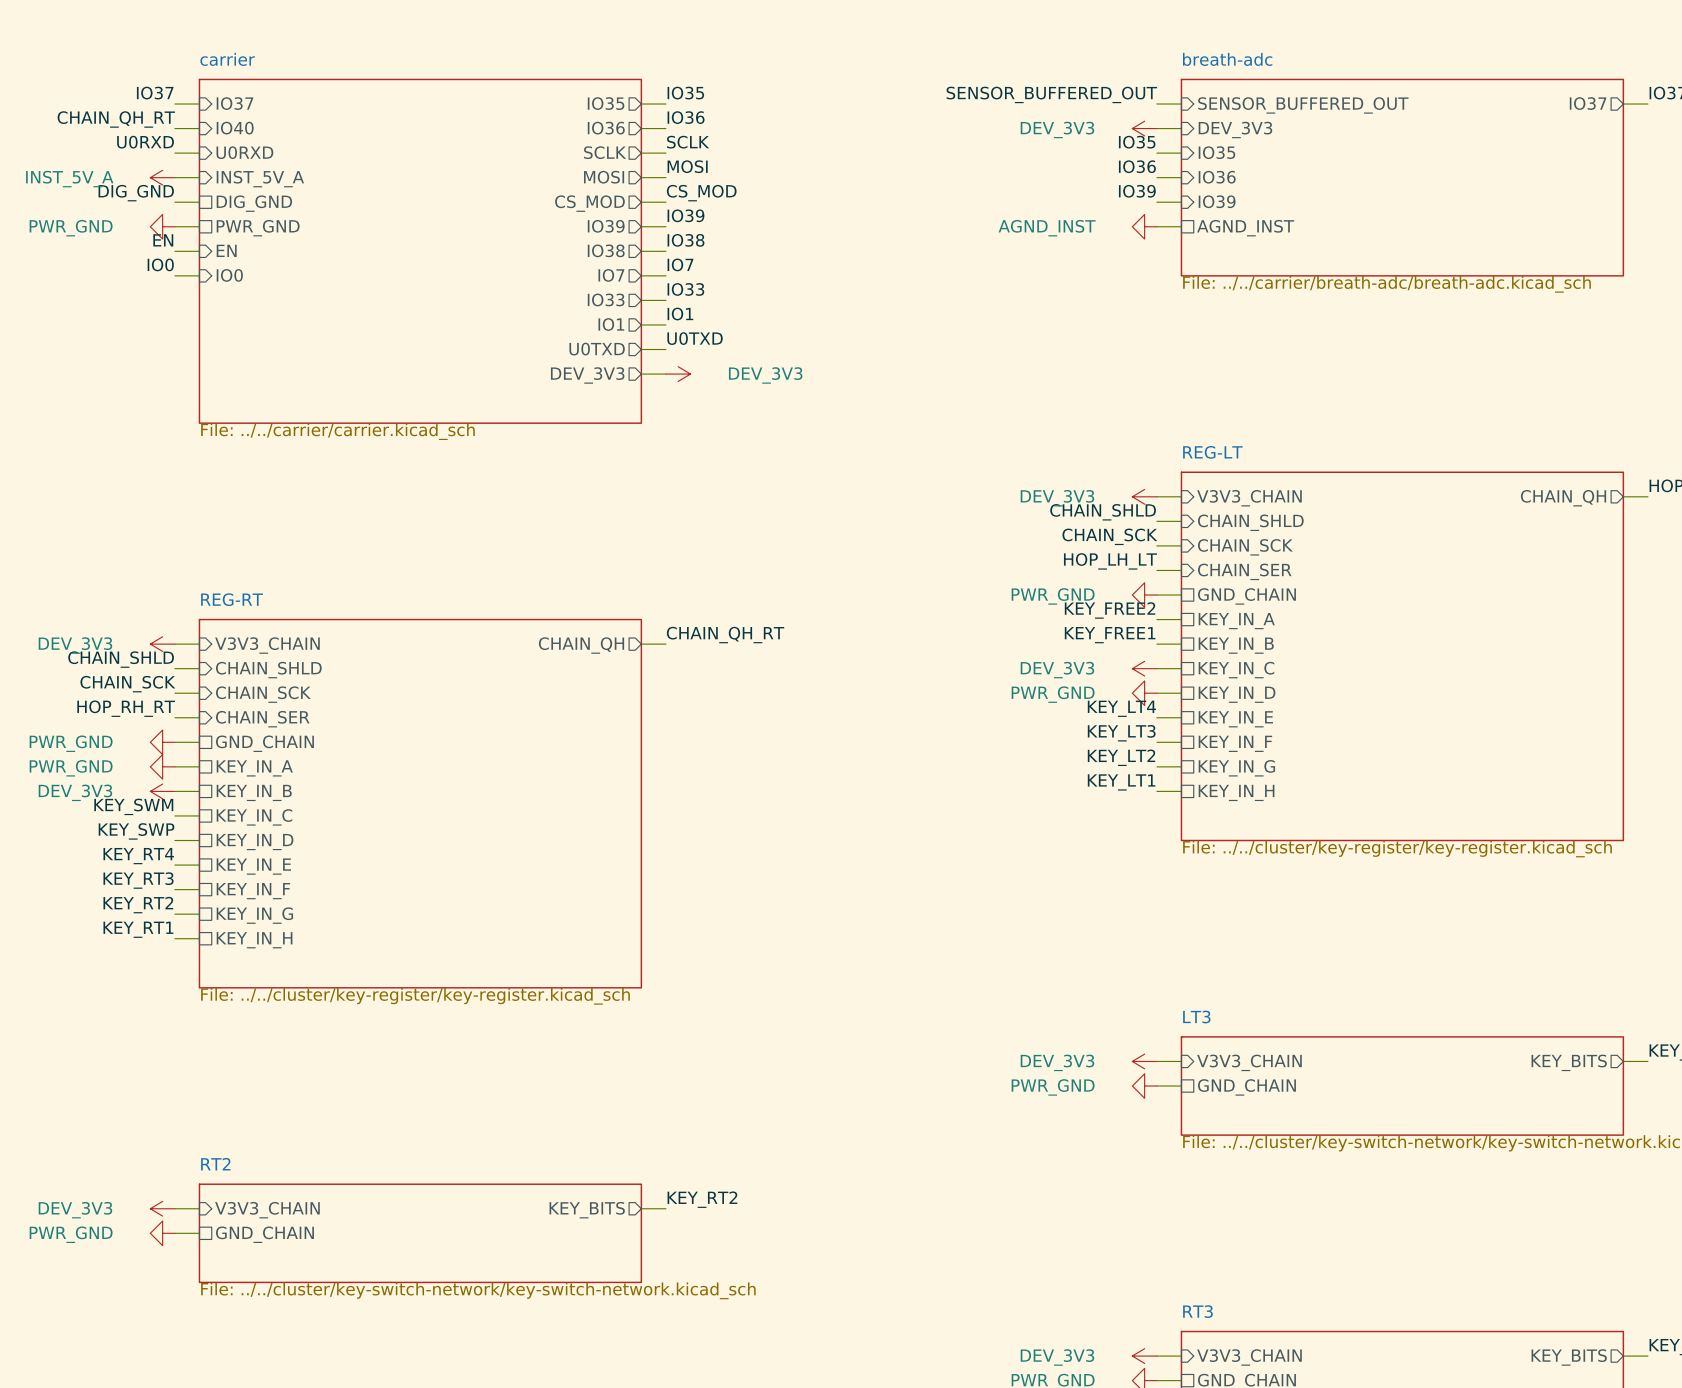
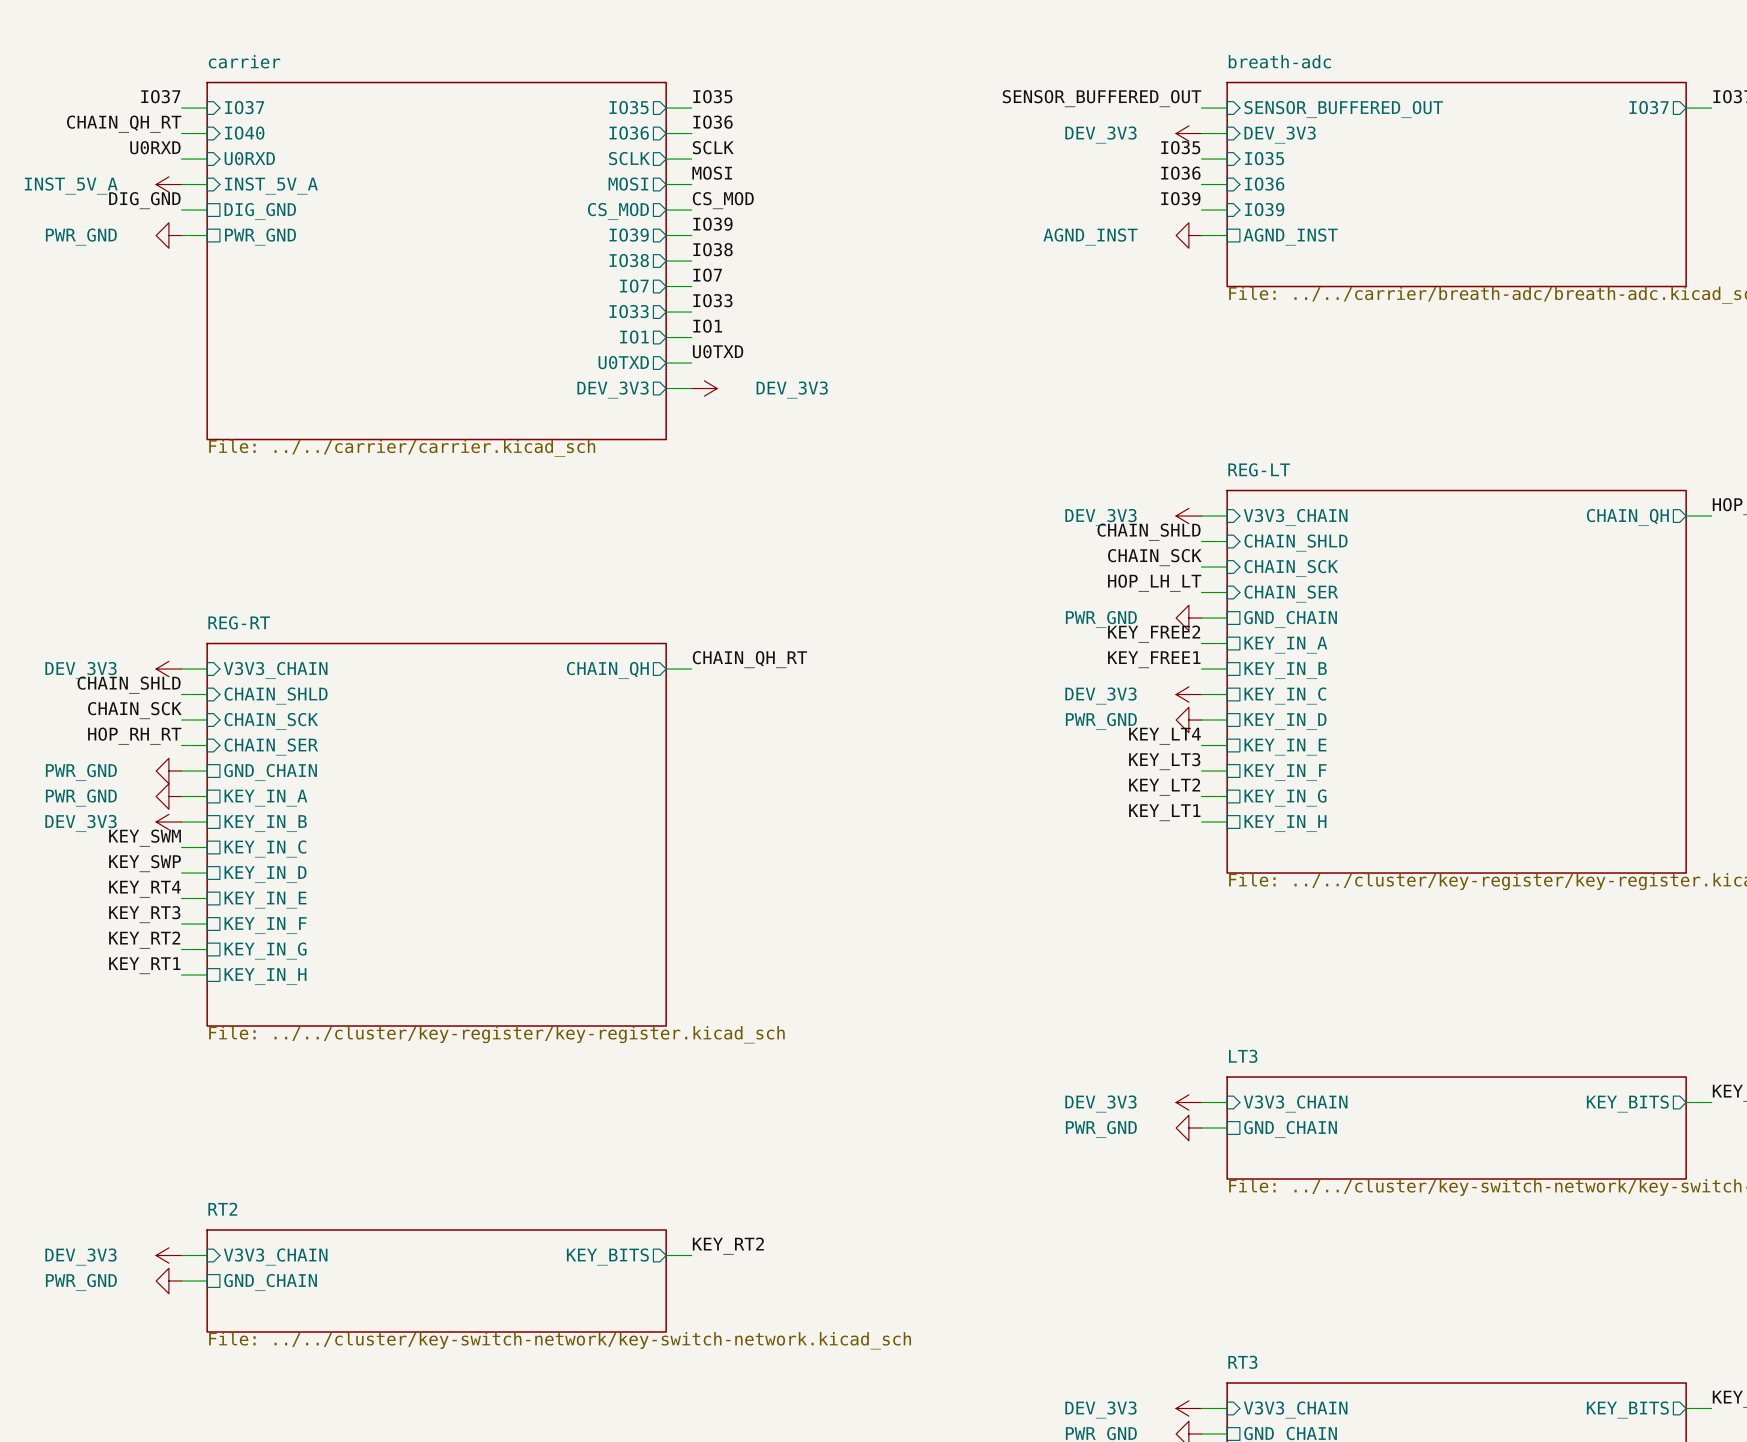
label: EN (163, 240) -> none
sheet pin: EN (226, 250) -> none
wire: (174, 251) (199, 251) -> none
label: IO0 (160, 264) -> none
wire: (174, 275) (199, 275) -> none
sheet pin: IO0 (229, 275) -> none

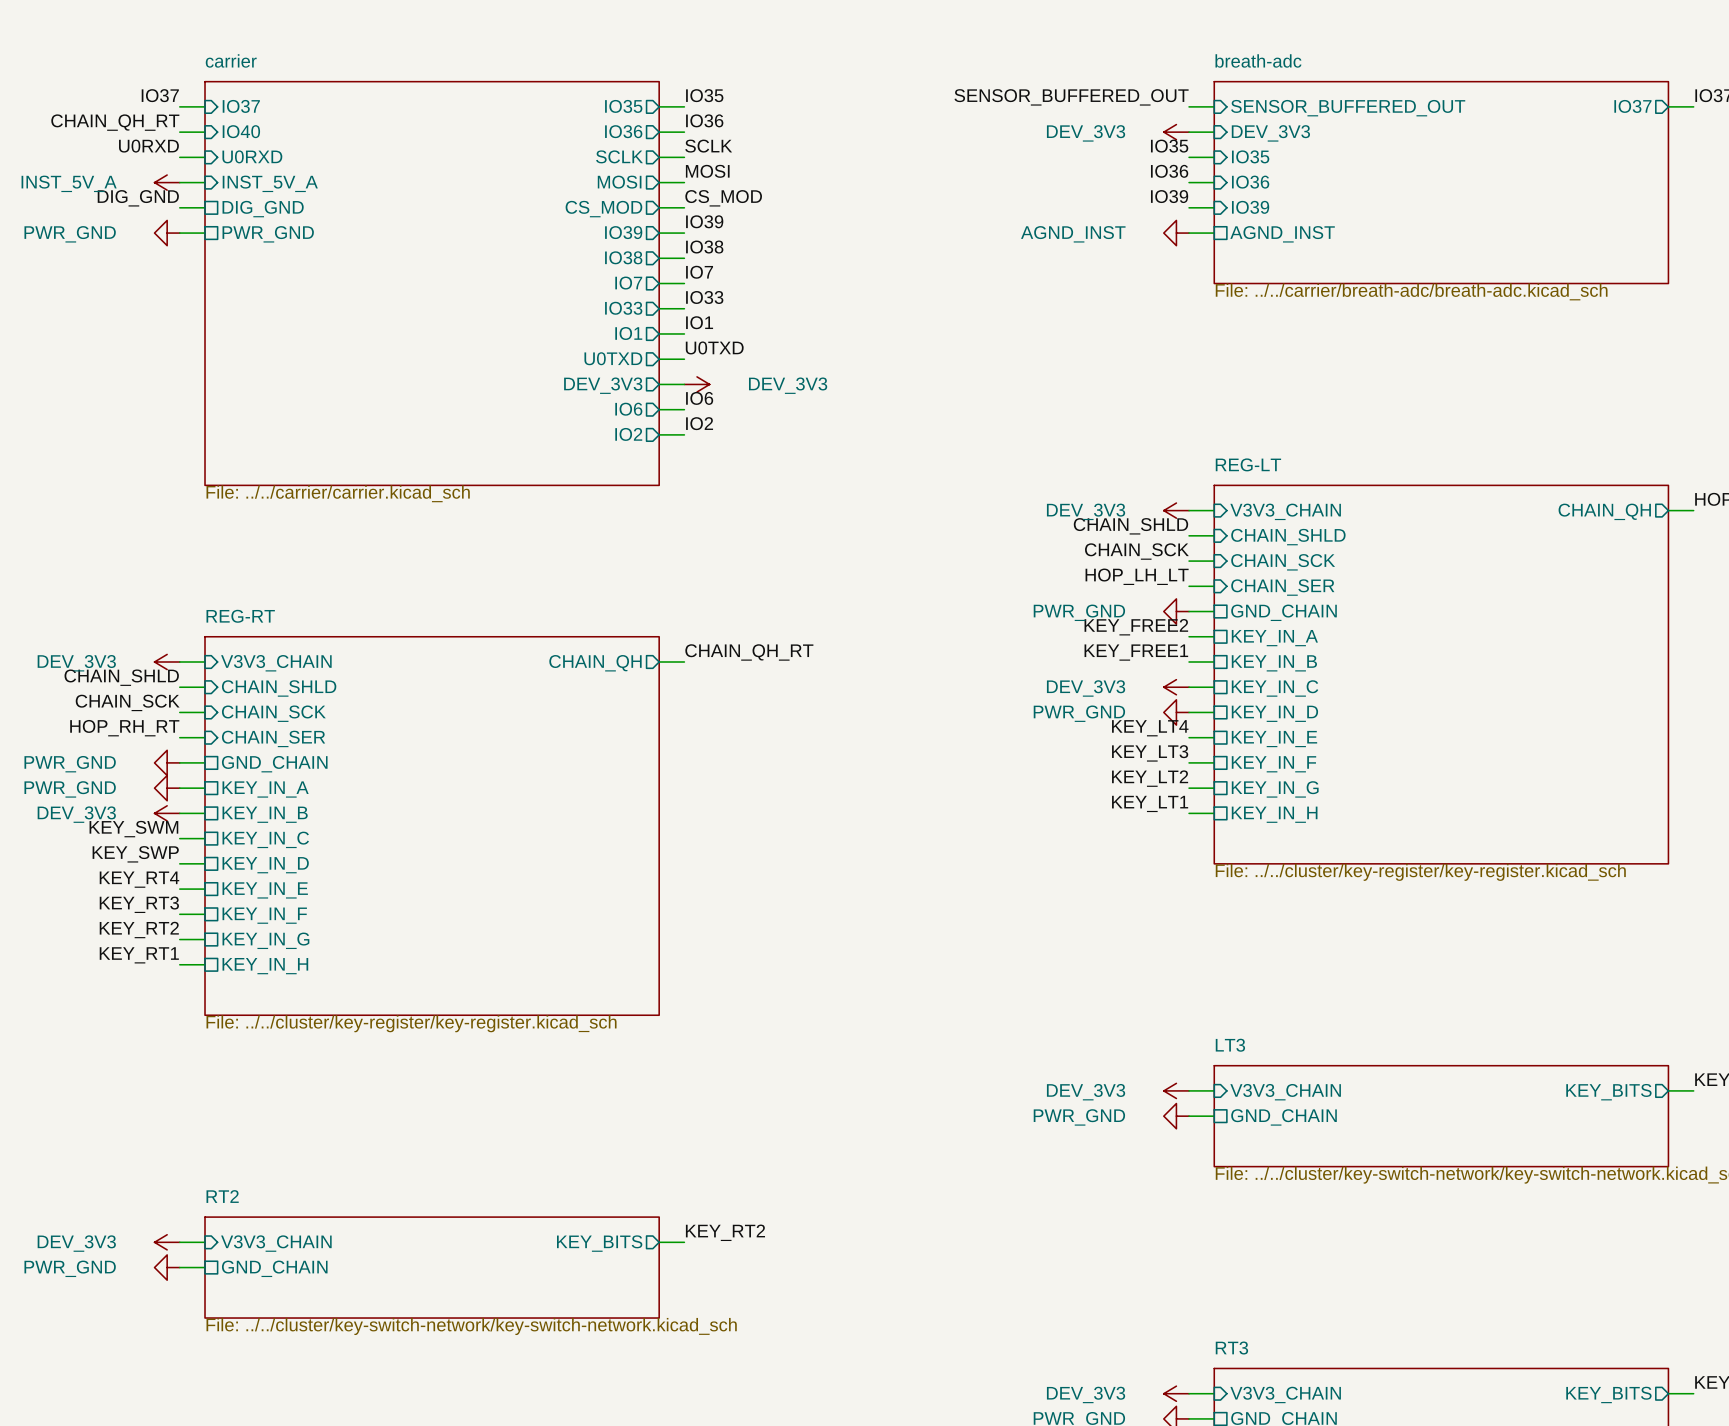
sheet carrier: File: ../../carrier/carrier.kicad_sch (436, 261) -> none
sheet carrier: none -> File: ../../carrier/carrier.kicad_sch (432, 283)
label: none -> IO6 (699, 398)
sheet pin: none -> IO6 (628, 409)
wire: none -> (659, 409) (684, 409)
label: none -> IO2 (699, 423)
sheet pin: none -> IO2 (628, 434)
wire: none -> (659, 434) (684, 434)

